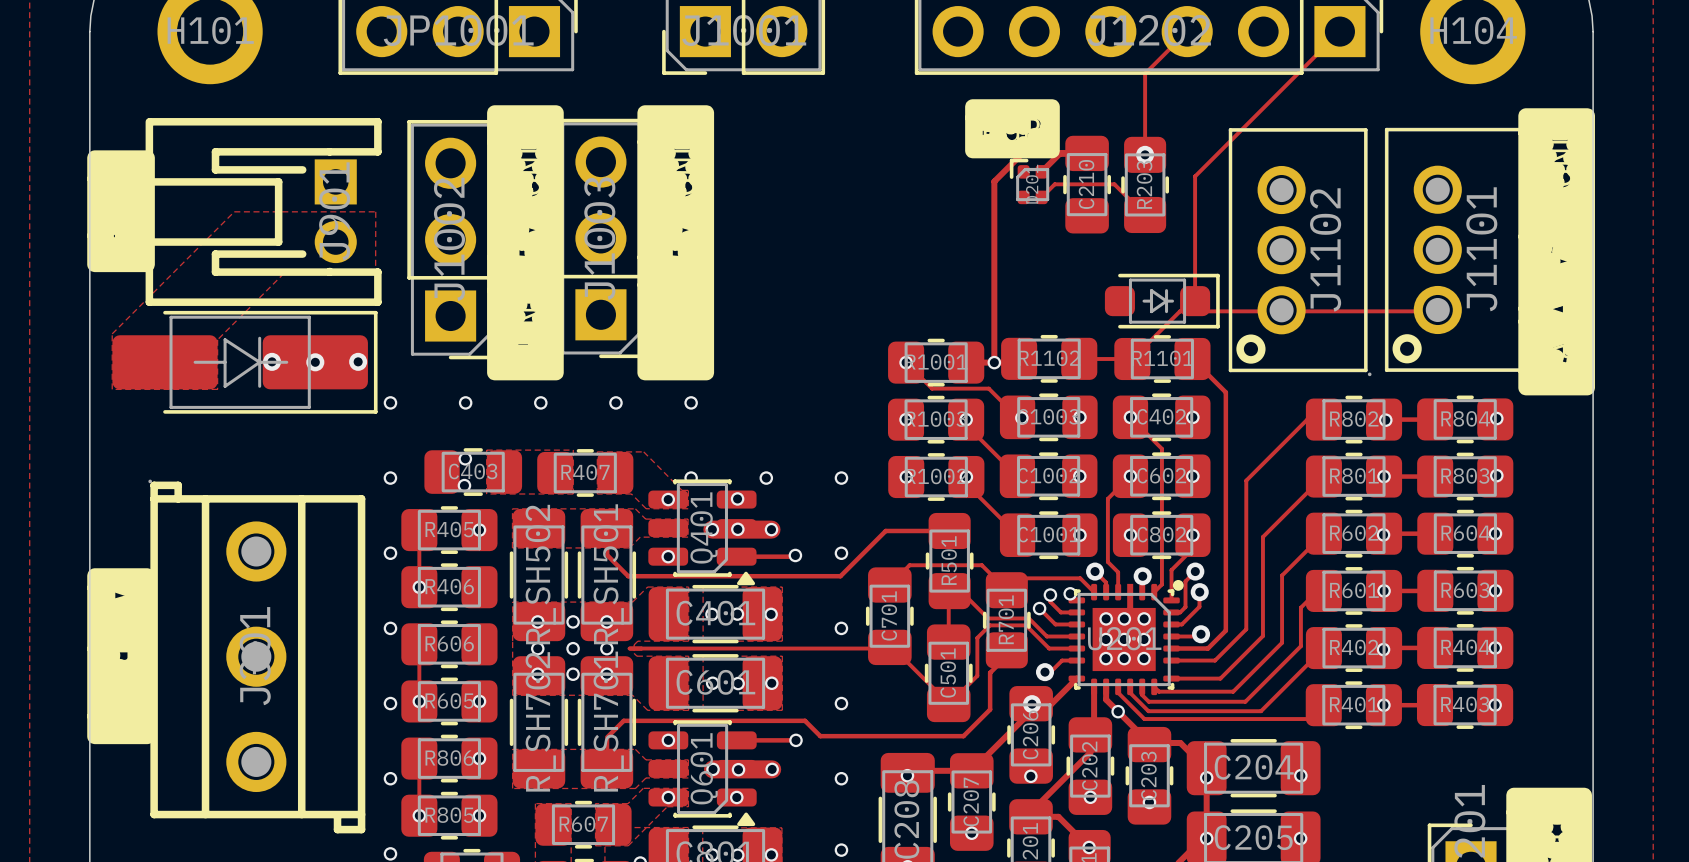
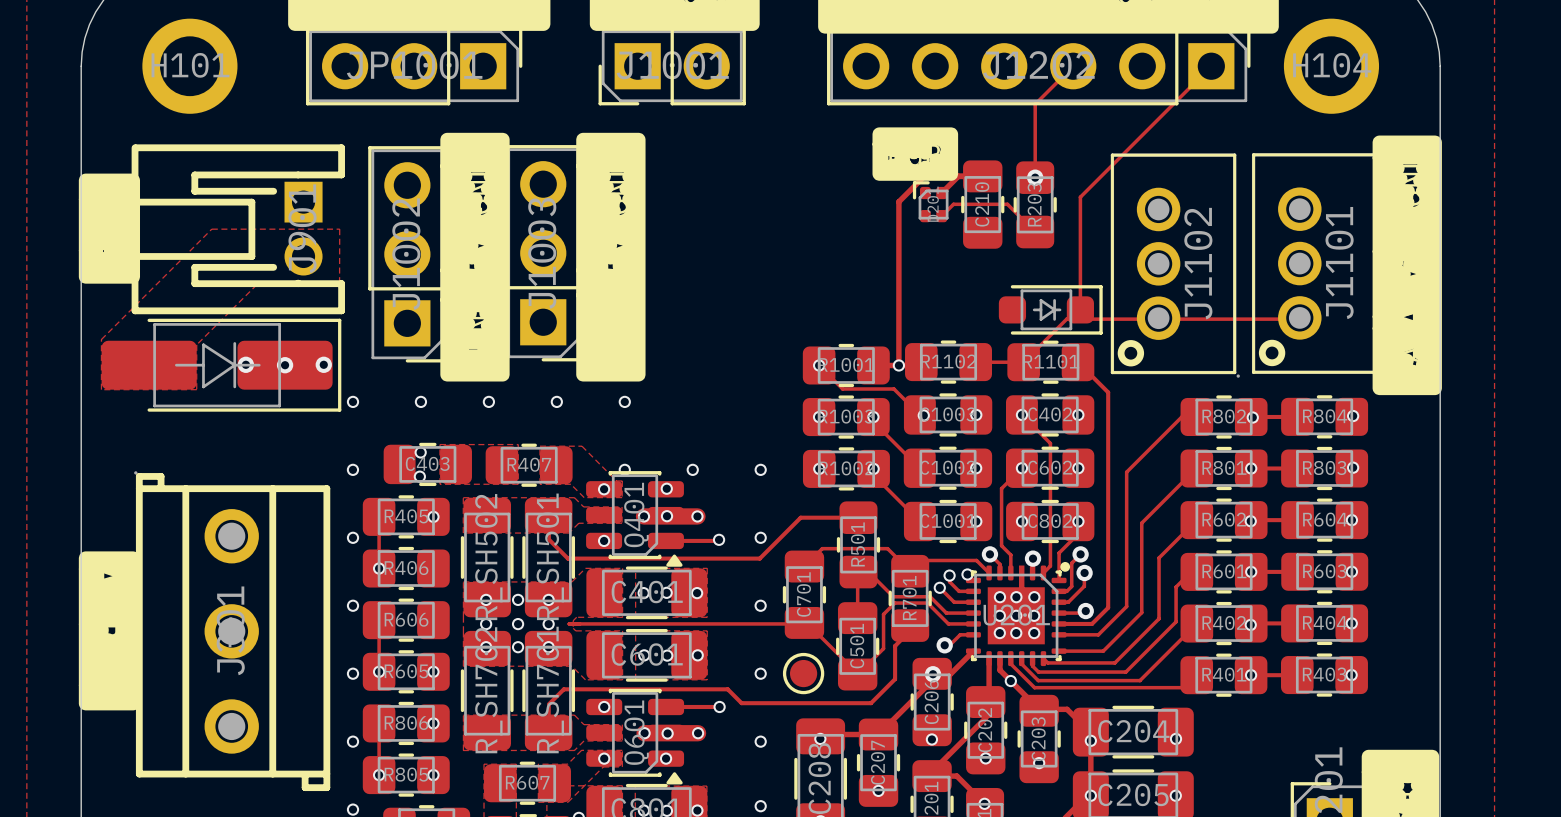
part: none -> (803, 673)

